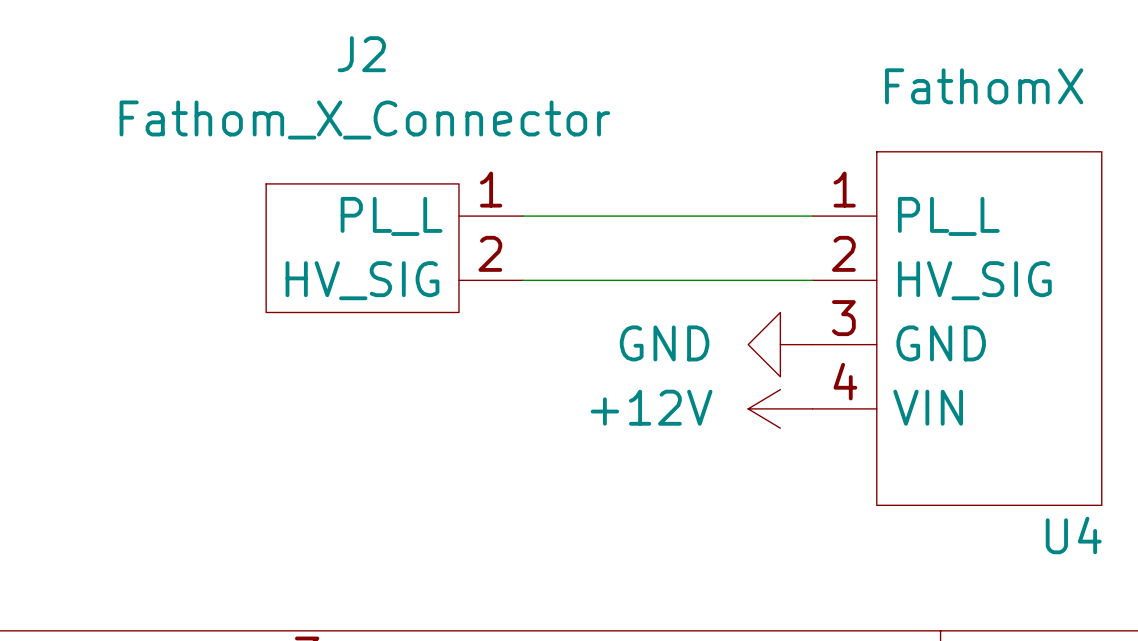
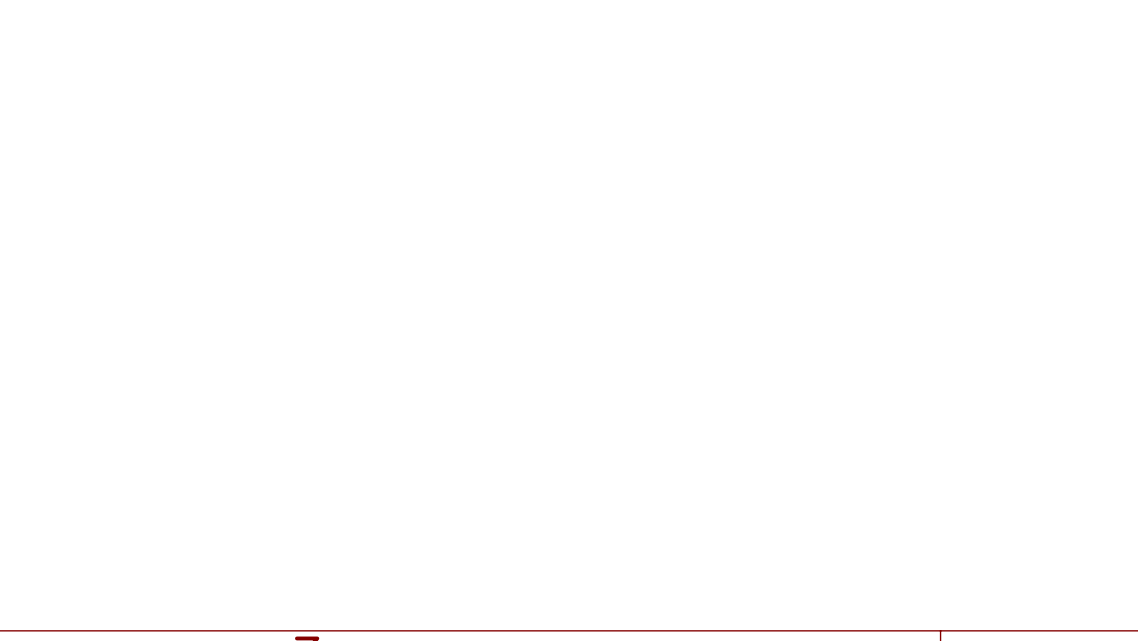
wire: (523, 216) (812, 216) -> none
J2: Fathom_X_Connector (394, 248) -> none
wire: (523, 280) (812, 280) -> none
U4: FathomX (957, 328) -> none
power symbol: GND (780, 344) -> none
power symbol: +12V (780, 408) -> none

